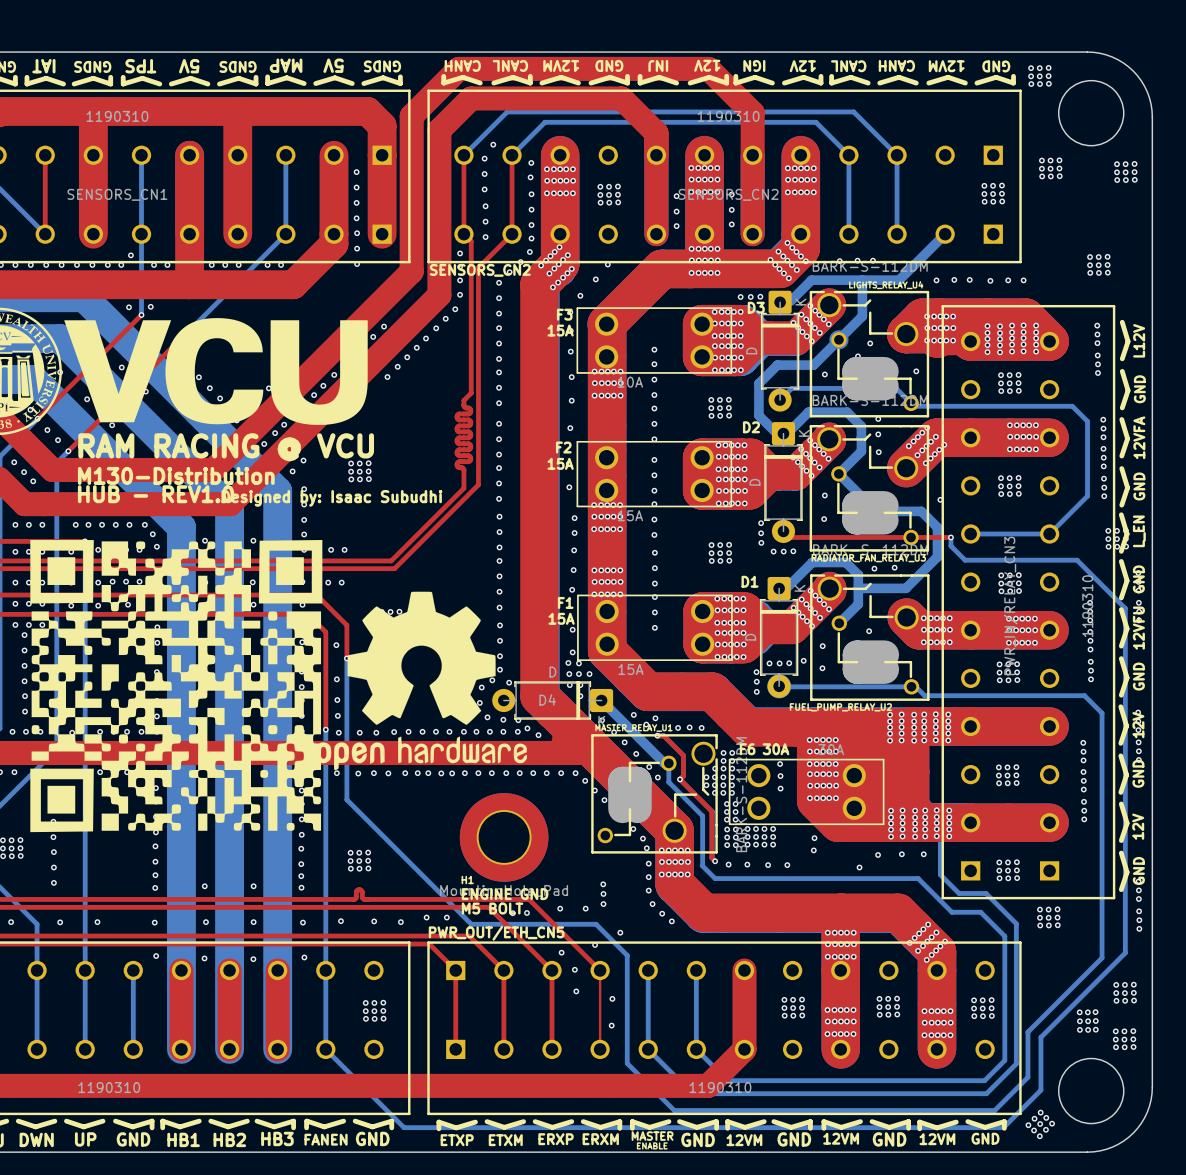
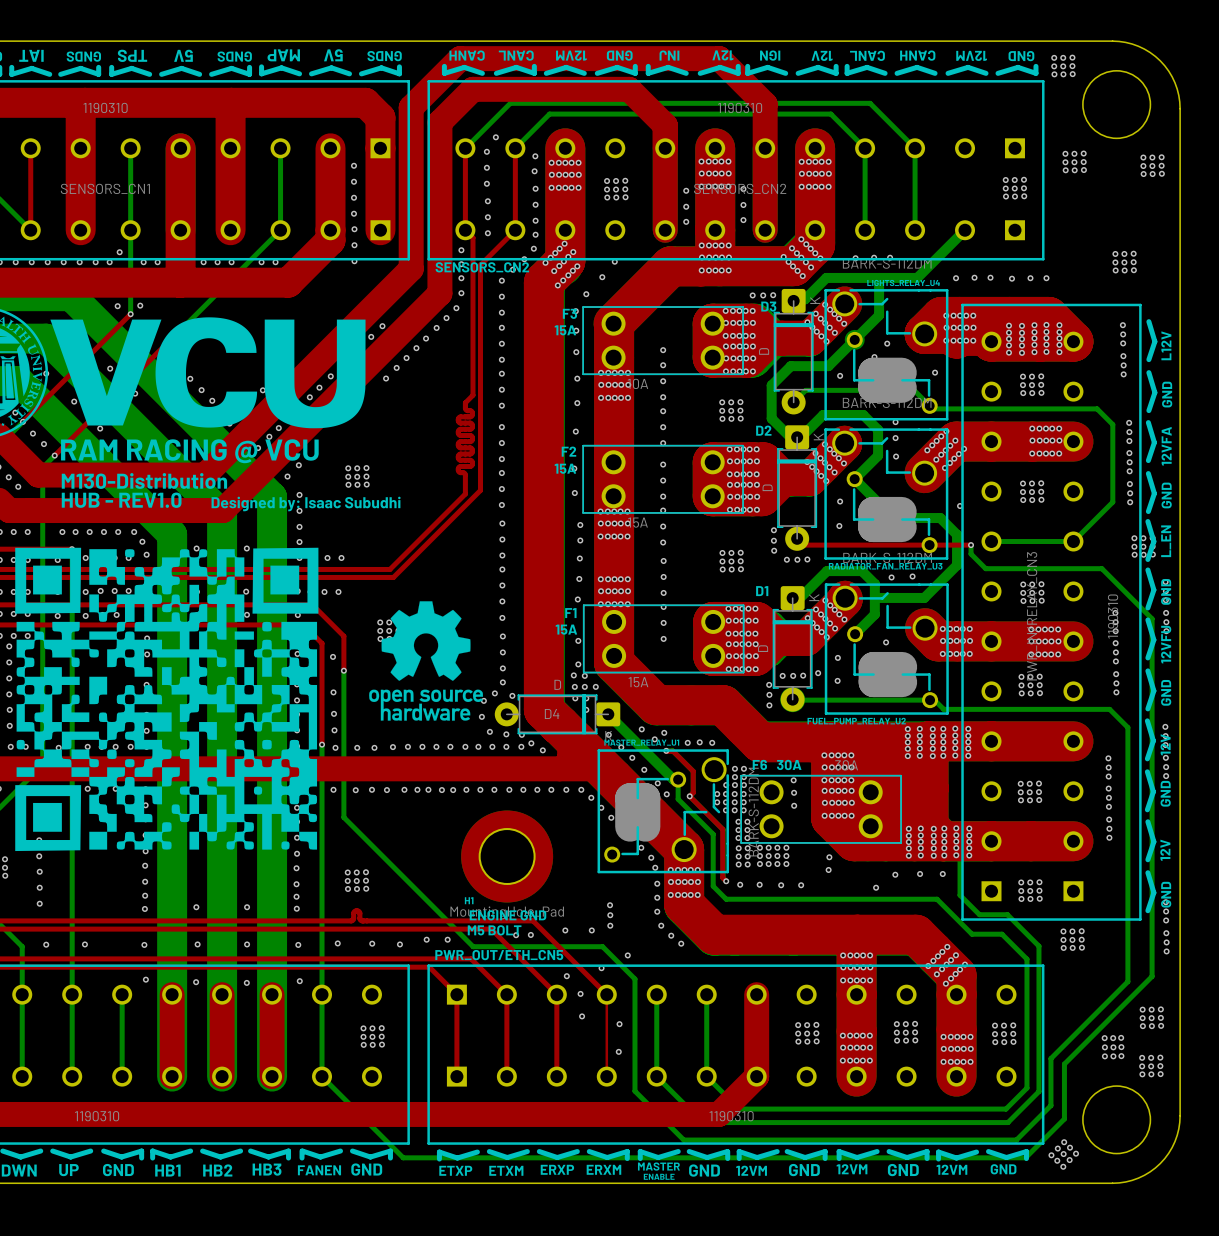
drawing: [316, 591, 528, 771] -> none
drawing: none -> [369, 601, 483, 721]

